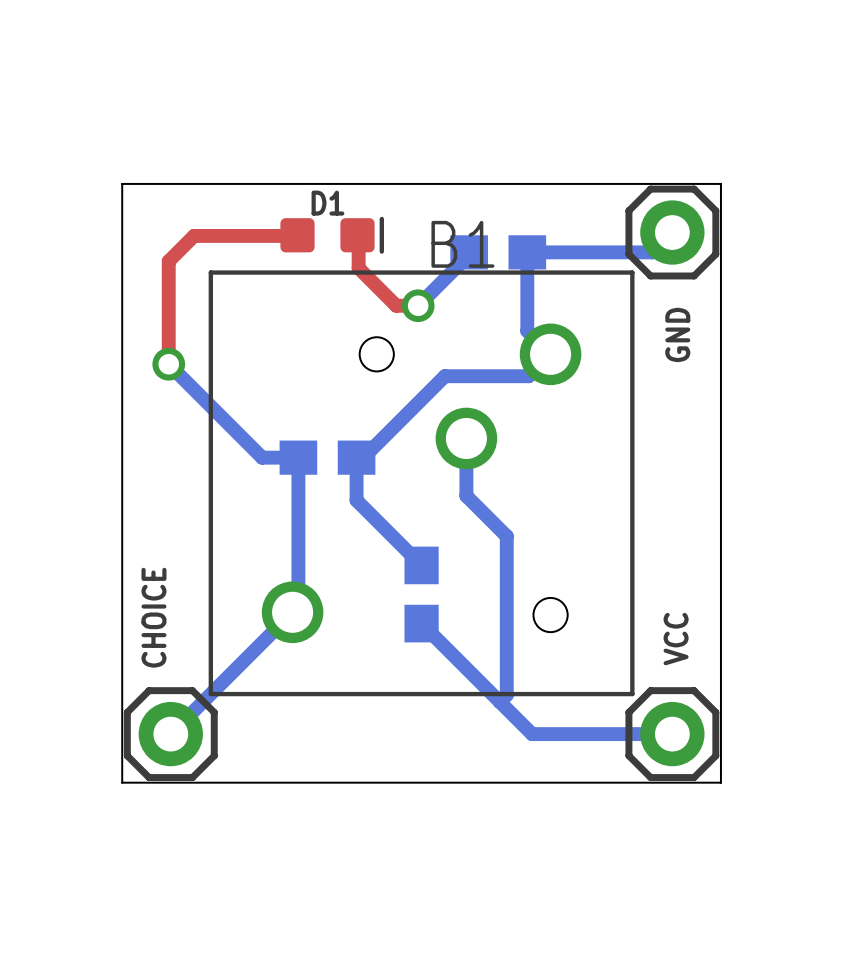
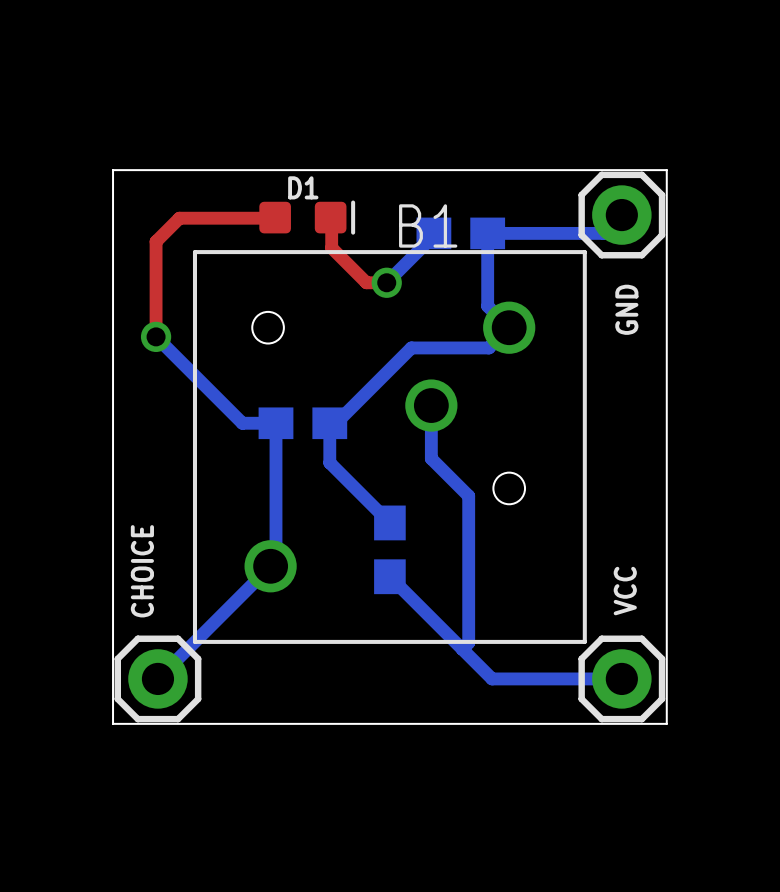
B1 footprint: [208, 270, 635, 697] -> [192, 250, 587, 644]

